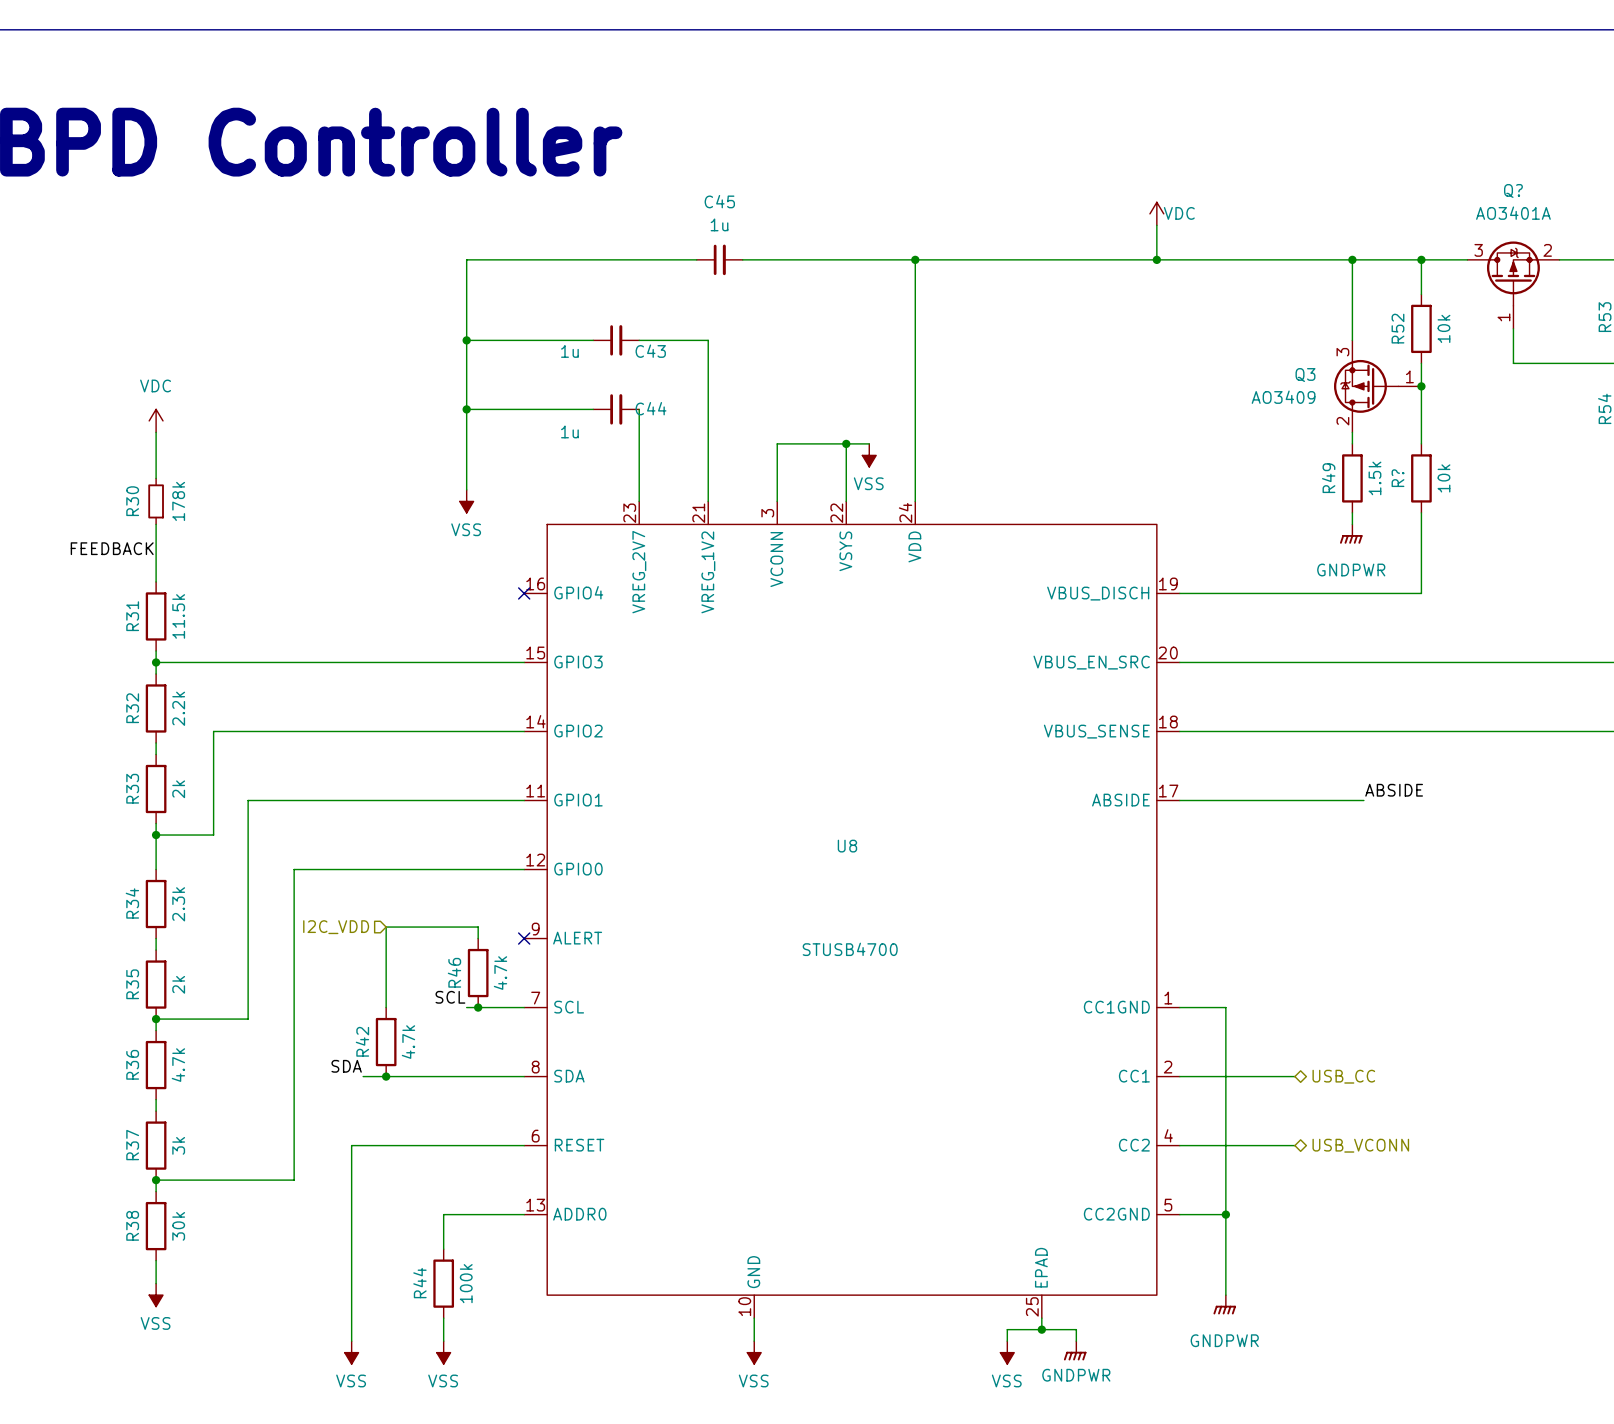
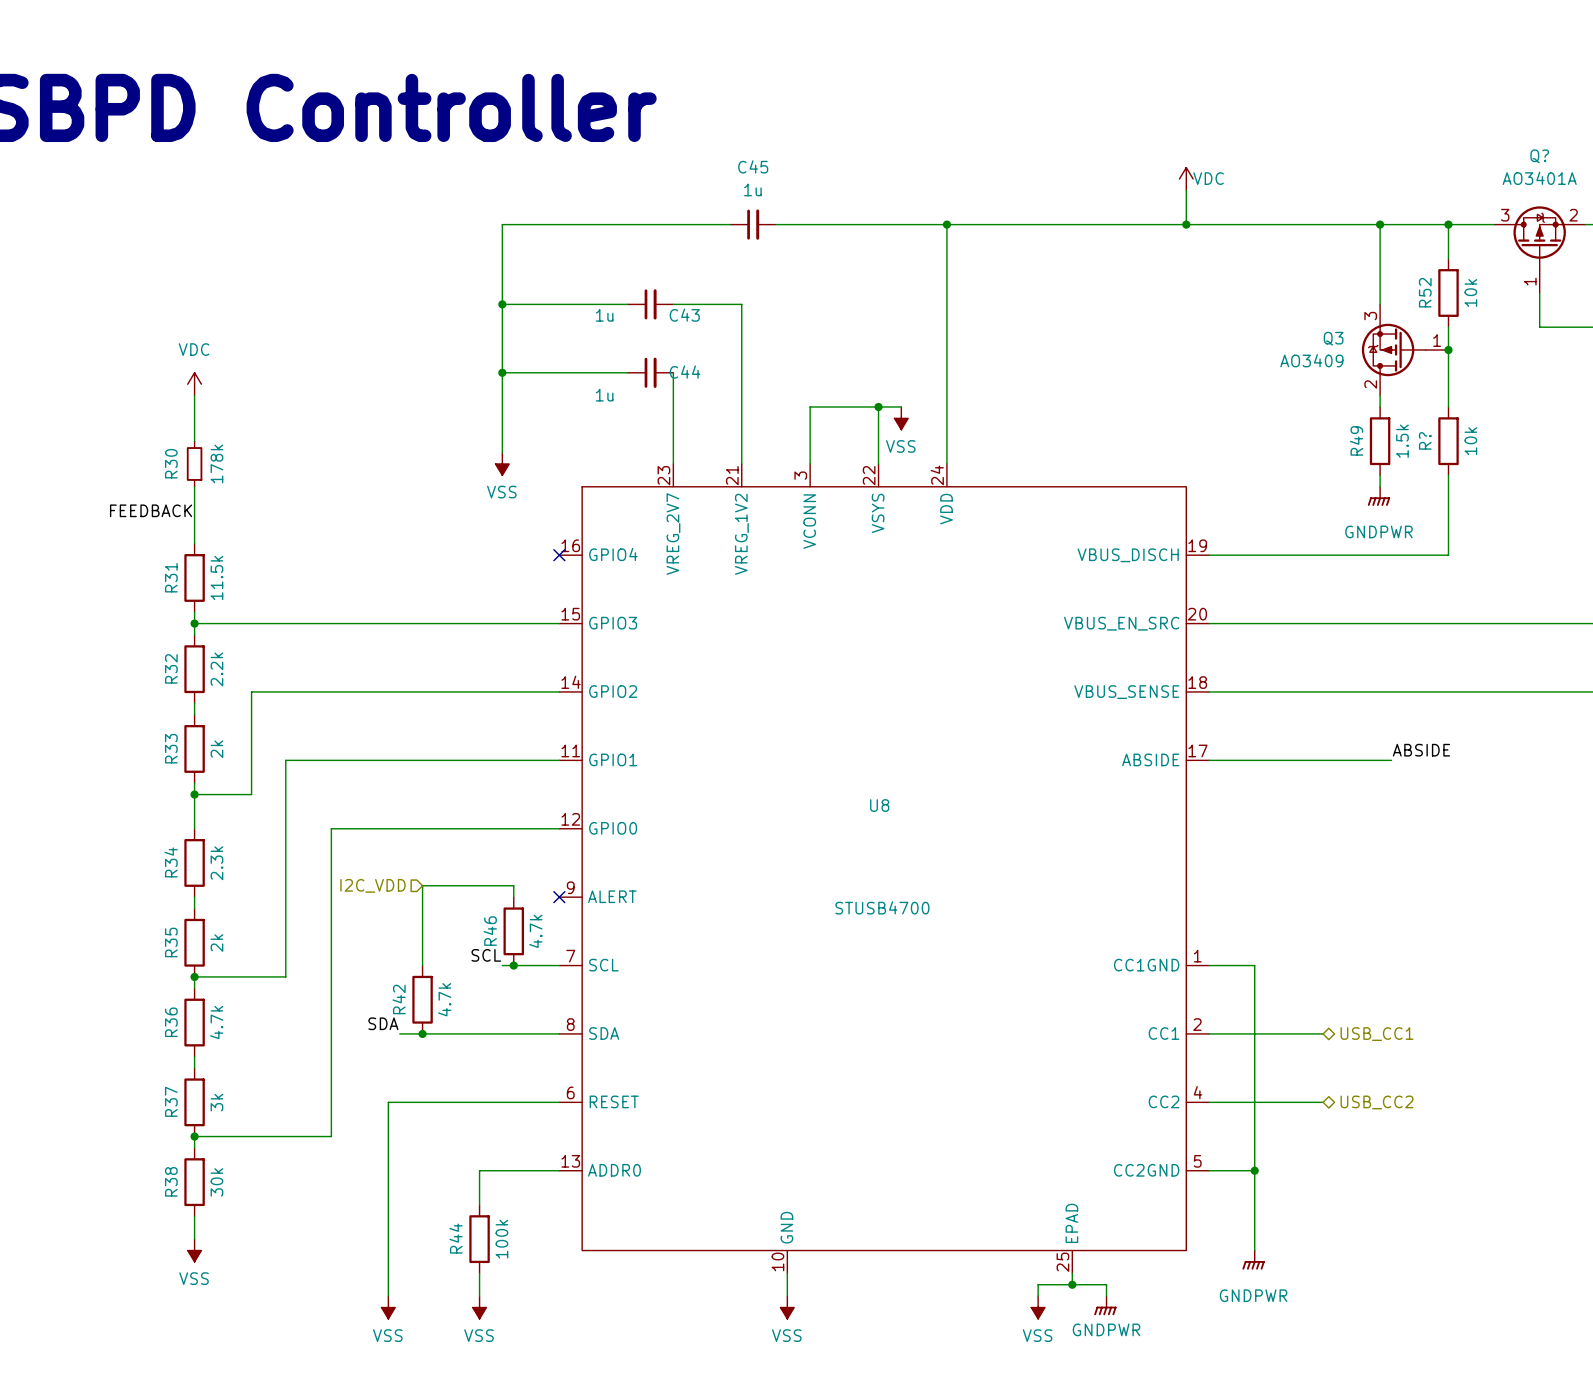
hierarchical label: USB_CC (1343, 1076) -> USB_CC1 (1377, 1034)
hierarchical label: USB_VCONN (1360, 1145) -> USB_CC2 (1377, 1102)

